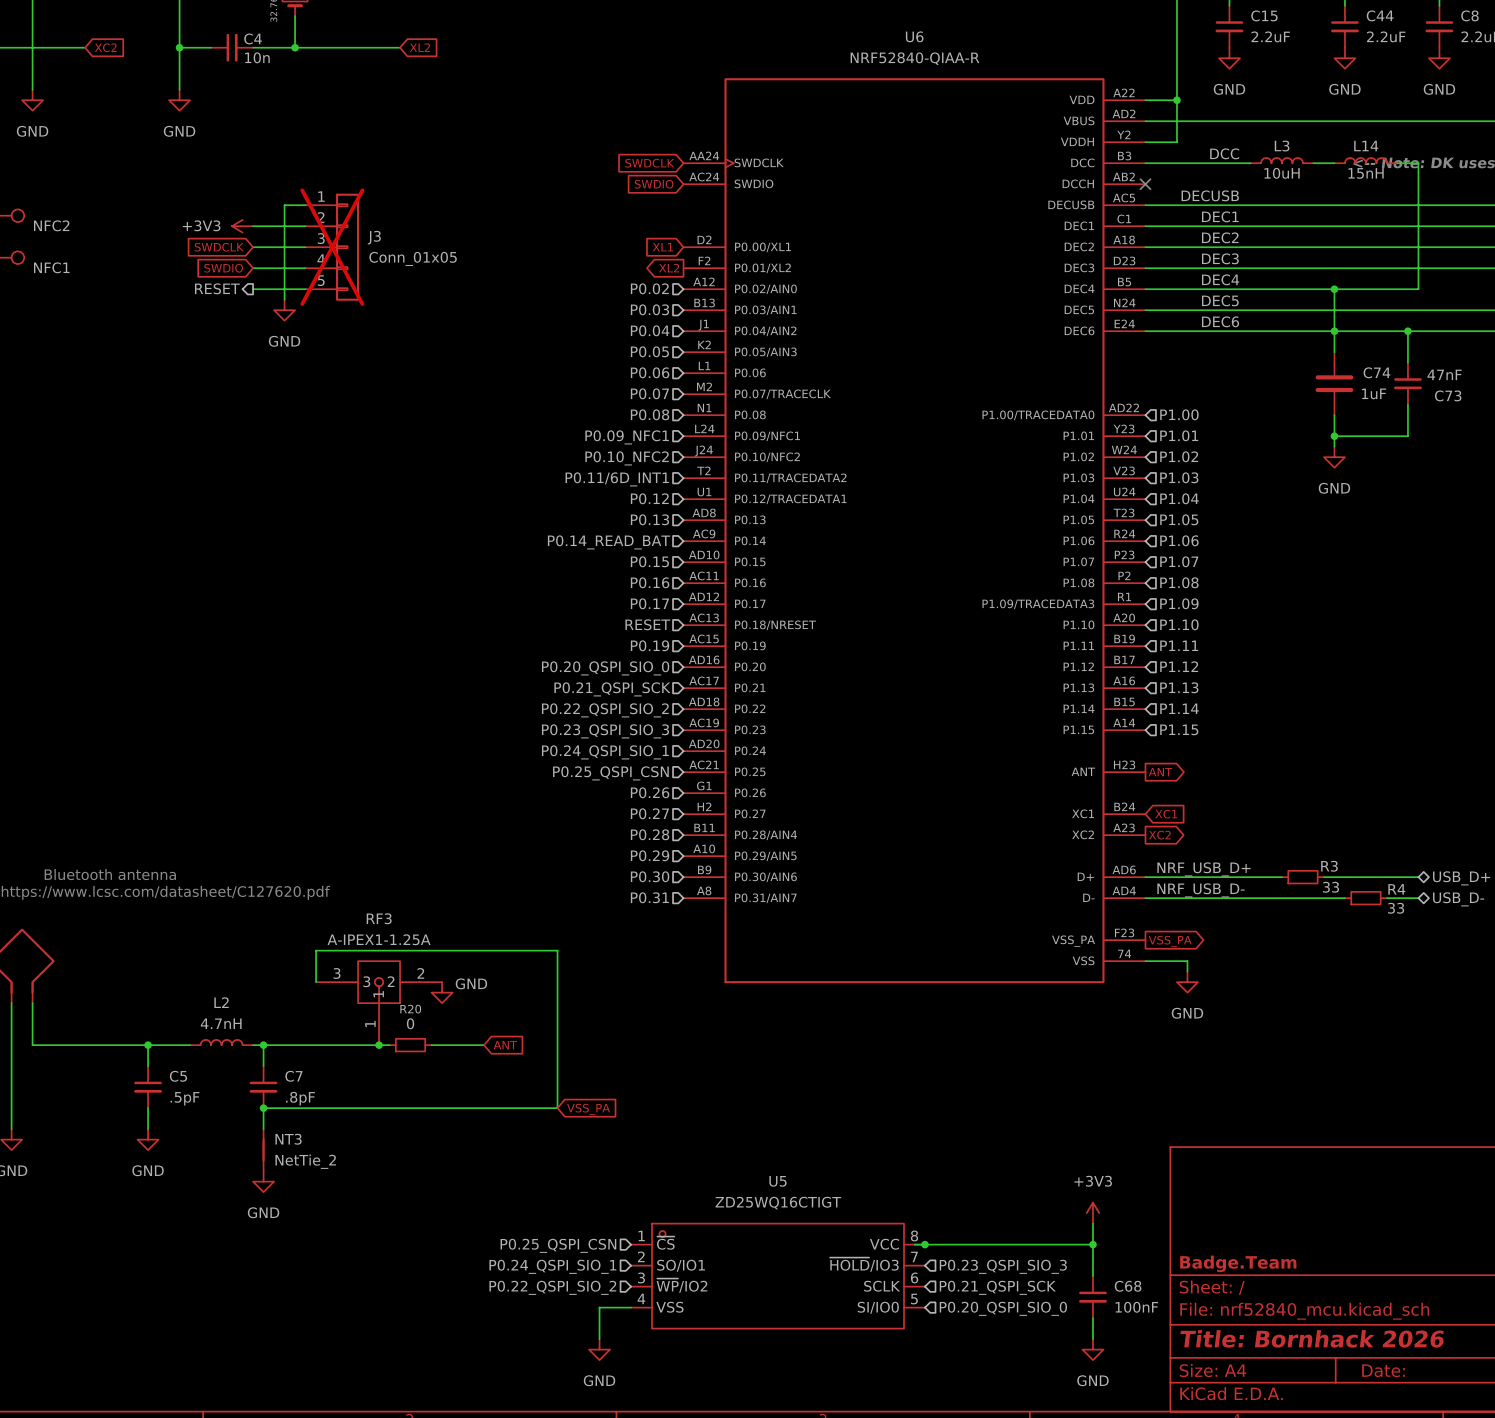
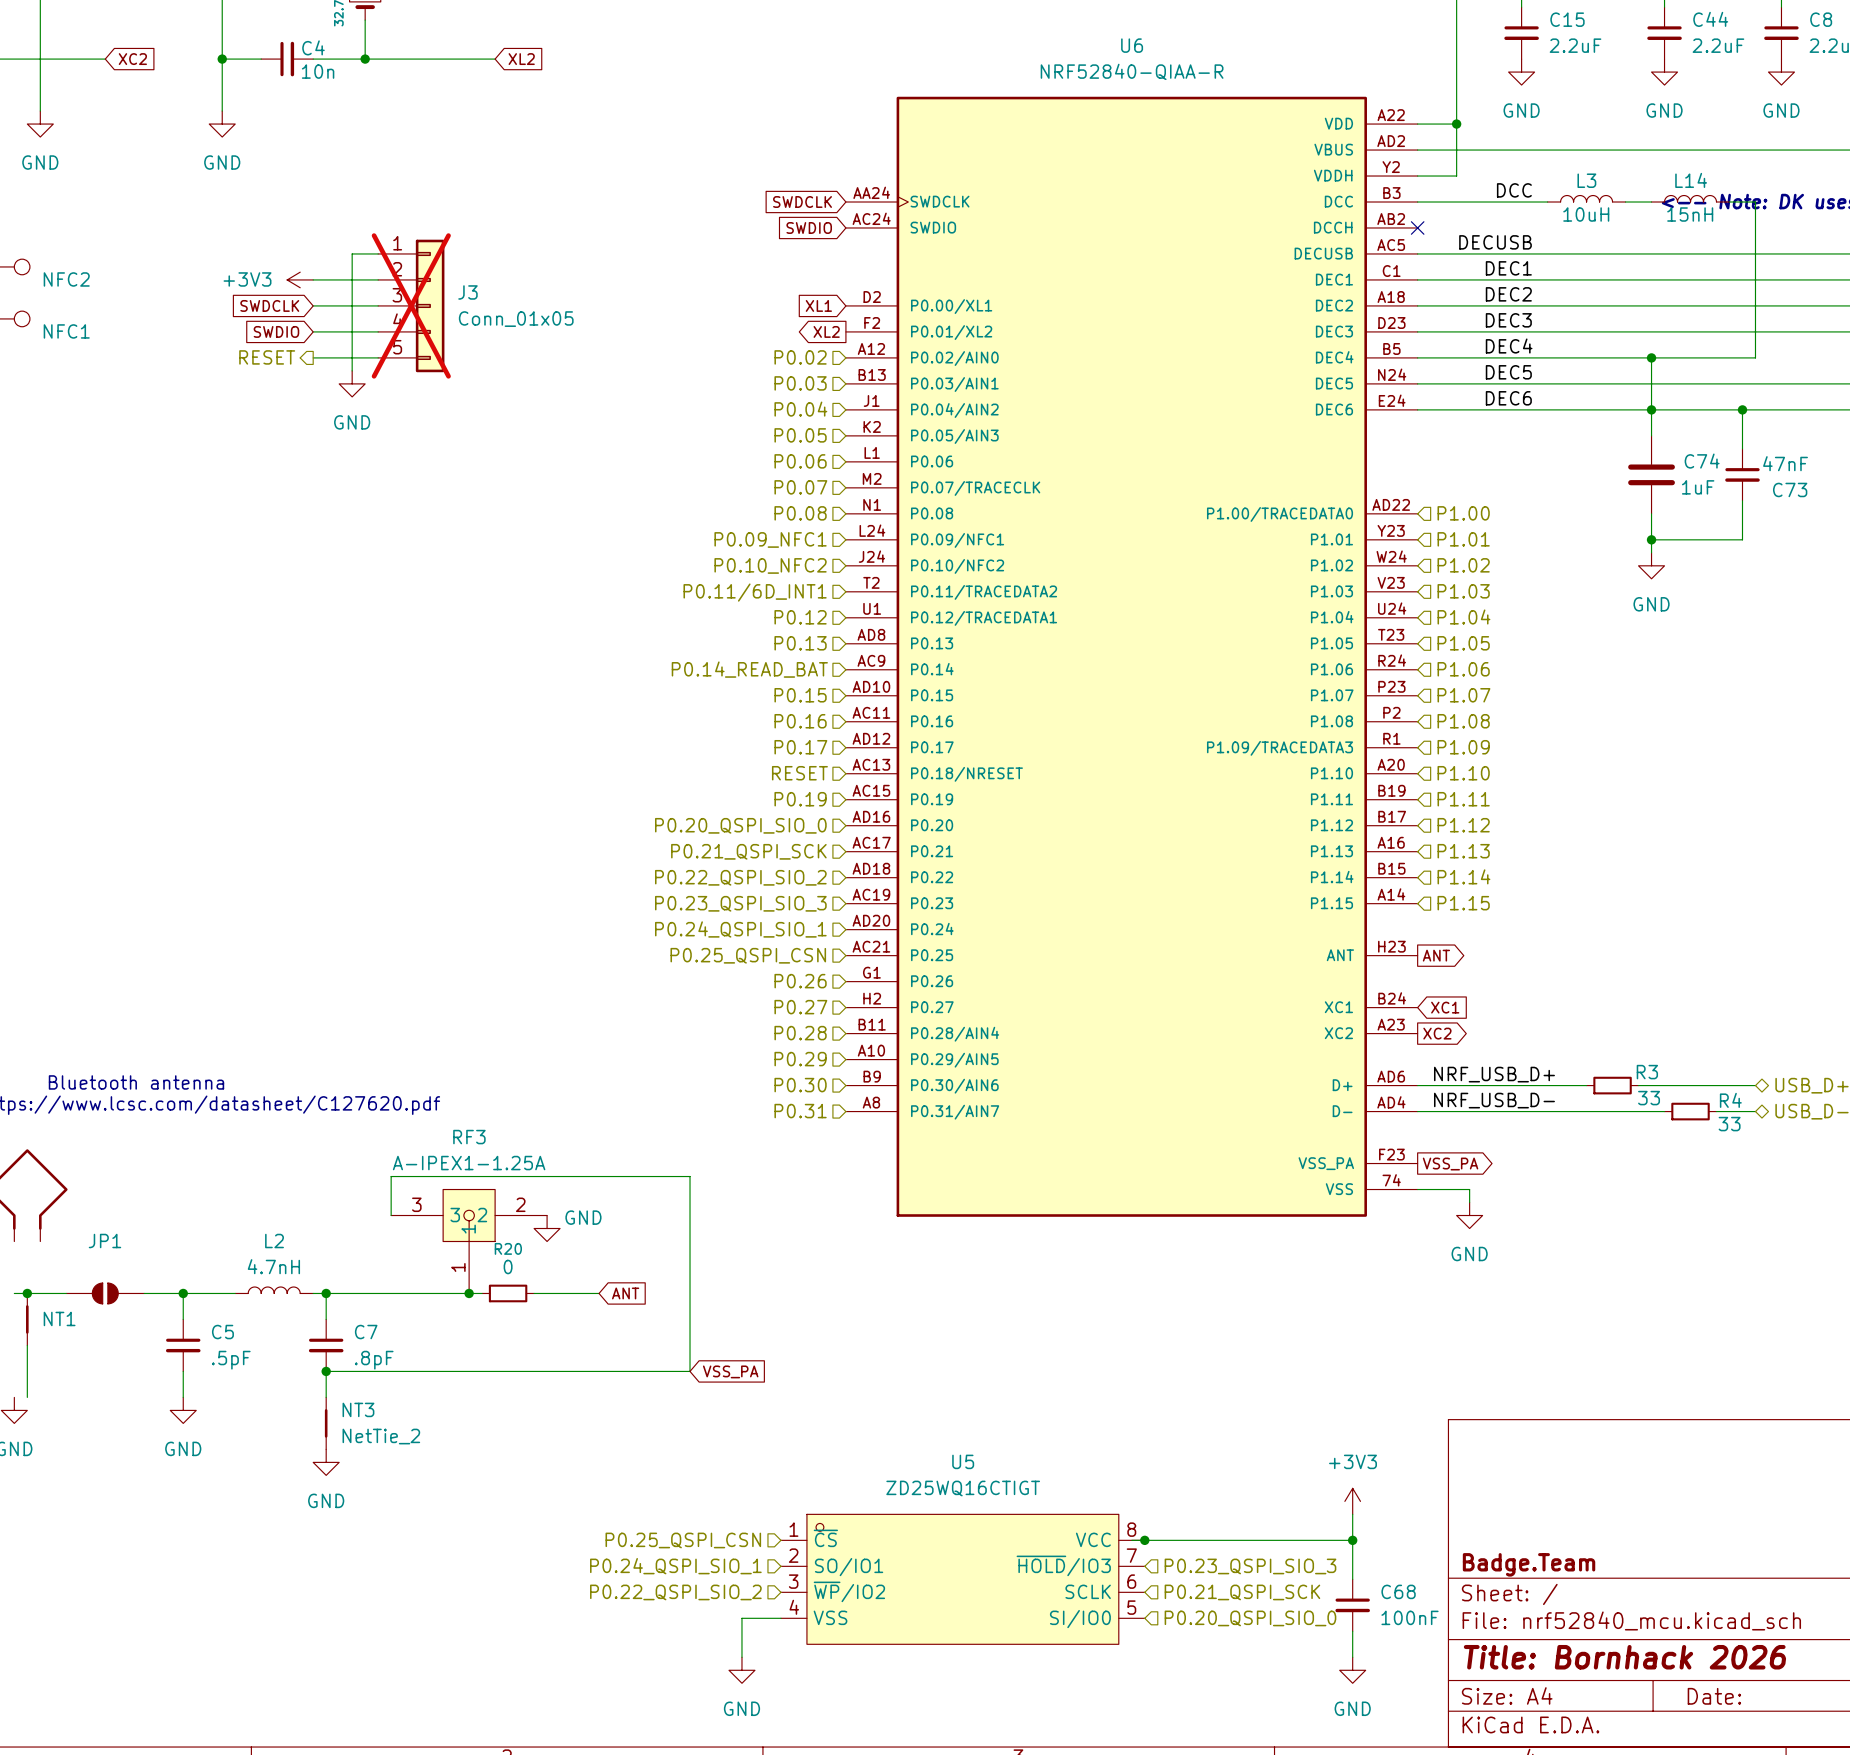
wire: (11, 1003) (11, 1129) -> none
wire: (32, 1003) (32, 1045) -> (14, 1293) (40, 1293)
junction: none -> (27, 1293)
JP1: none -> (105, 1293)
NT1: none -> (27, 1319)
wire: none -> (27, 1345) (27, 1397)

